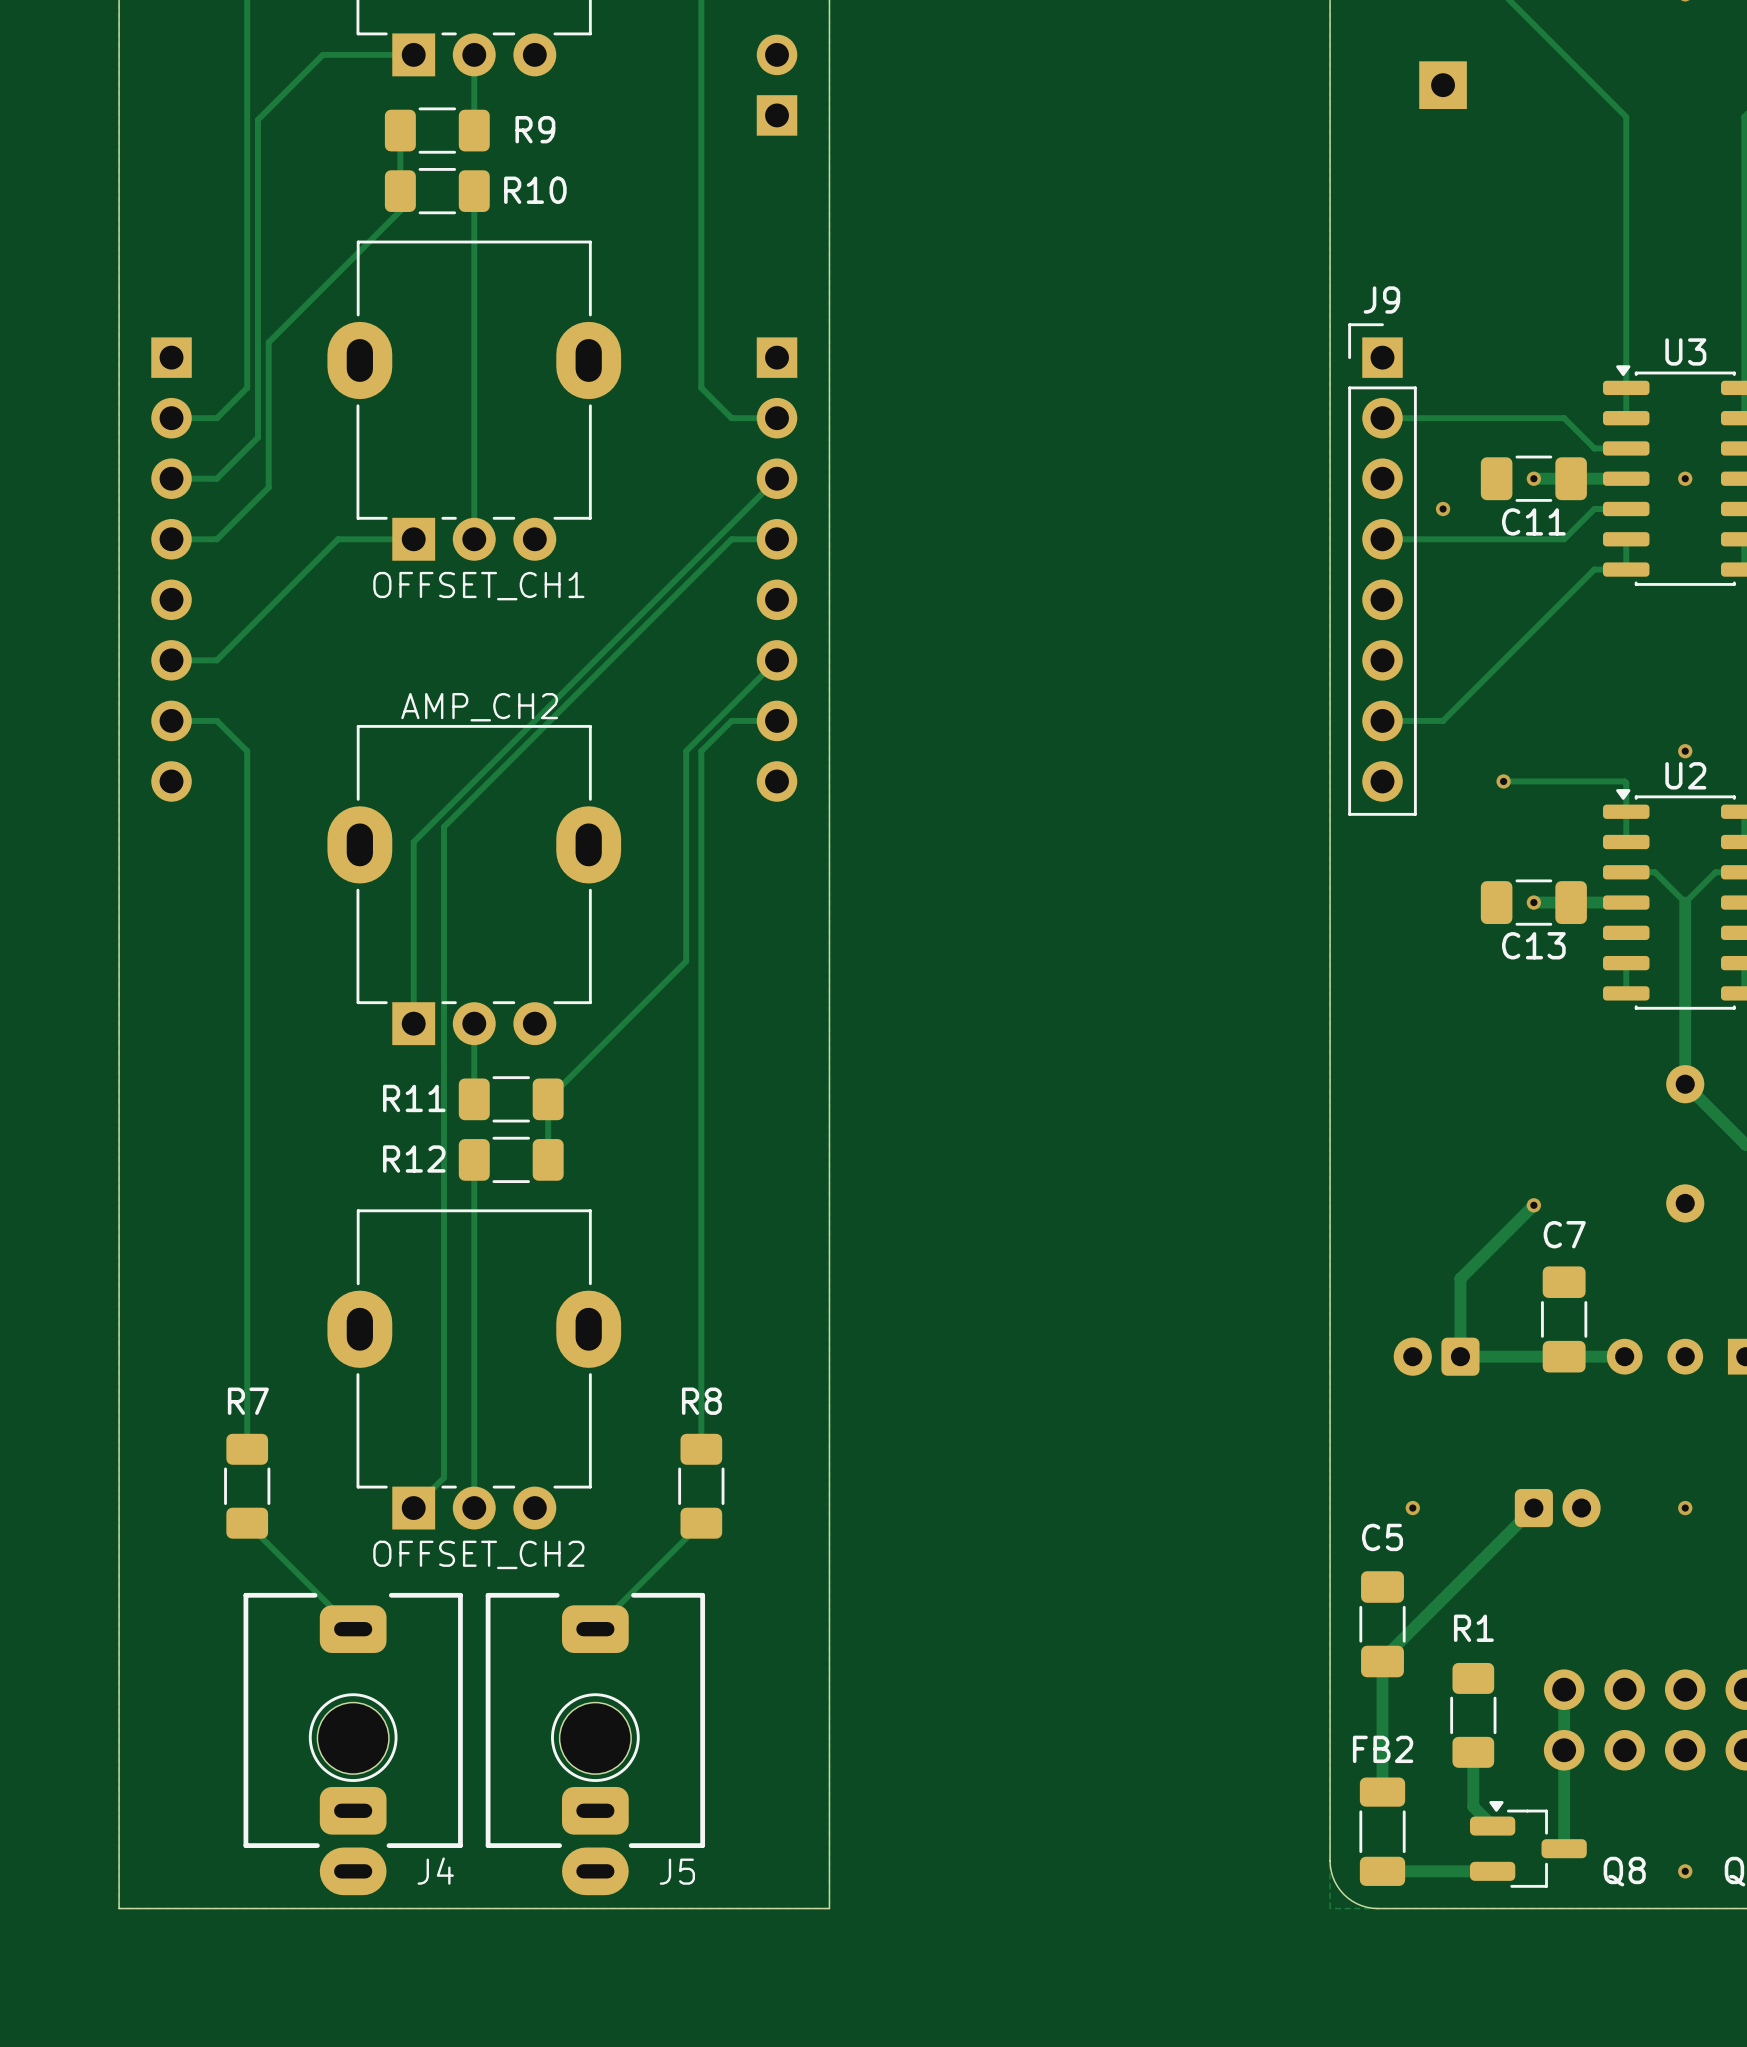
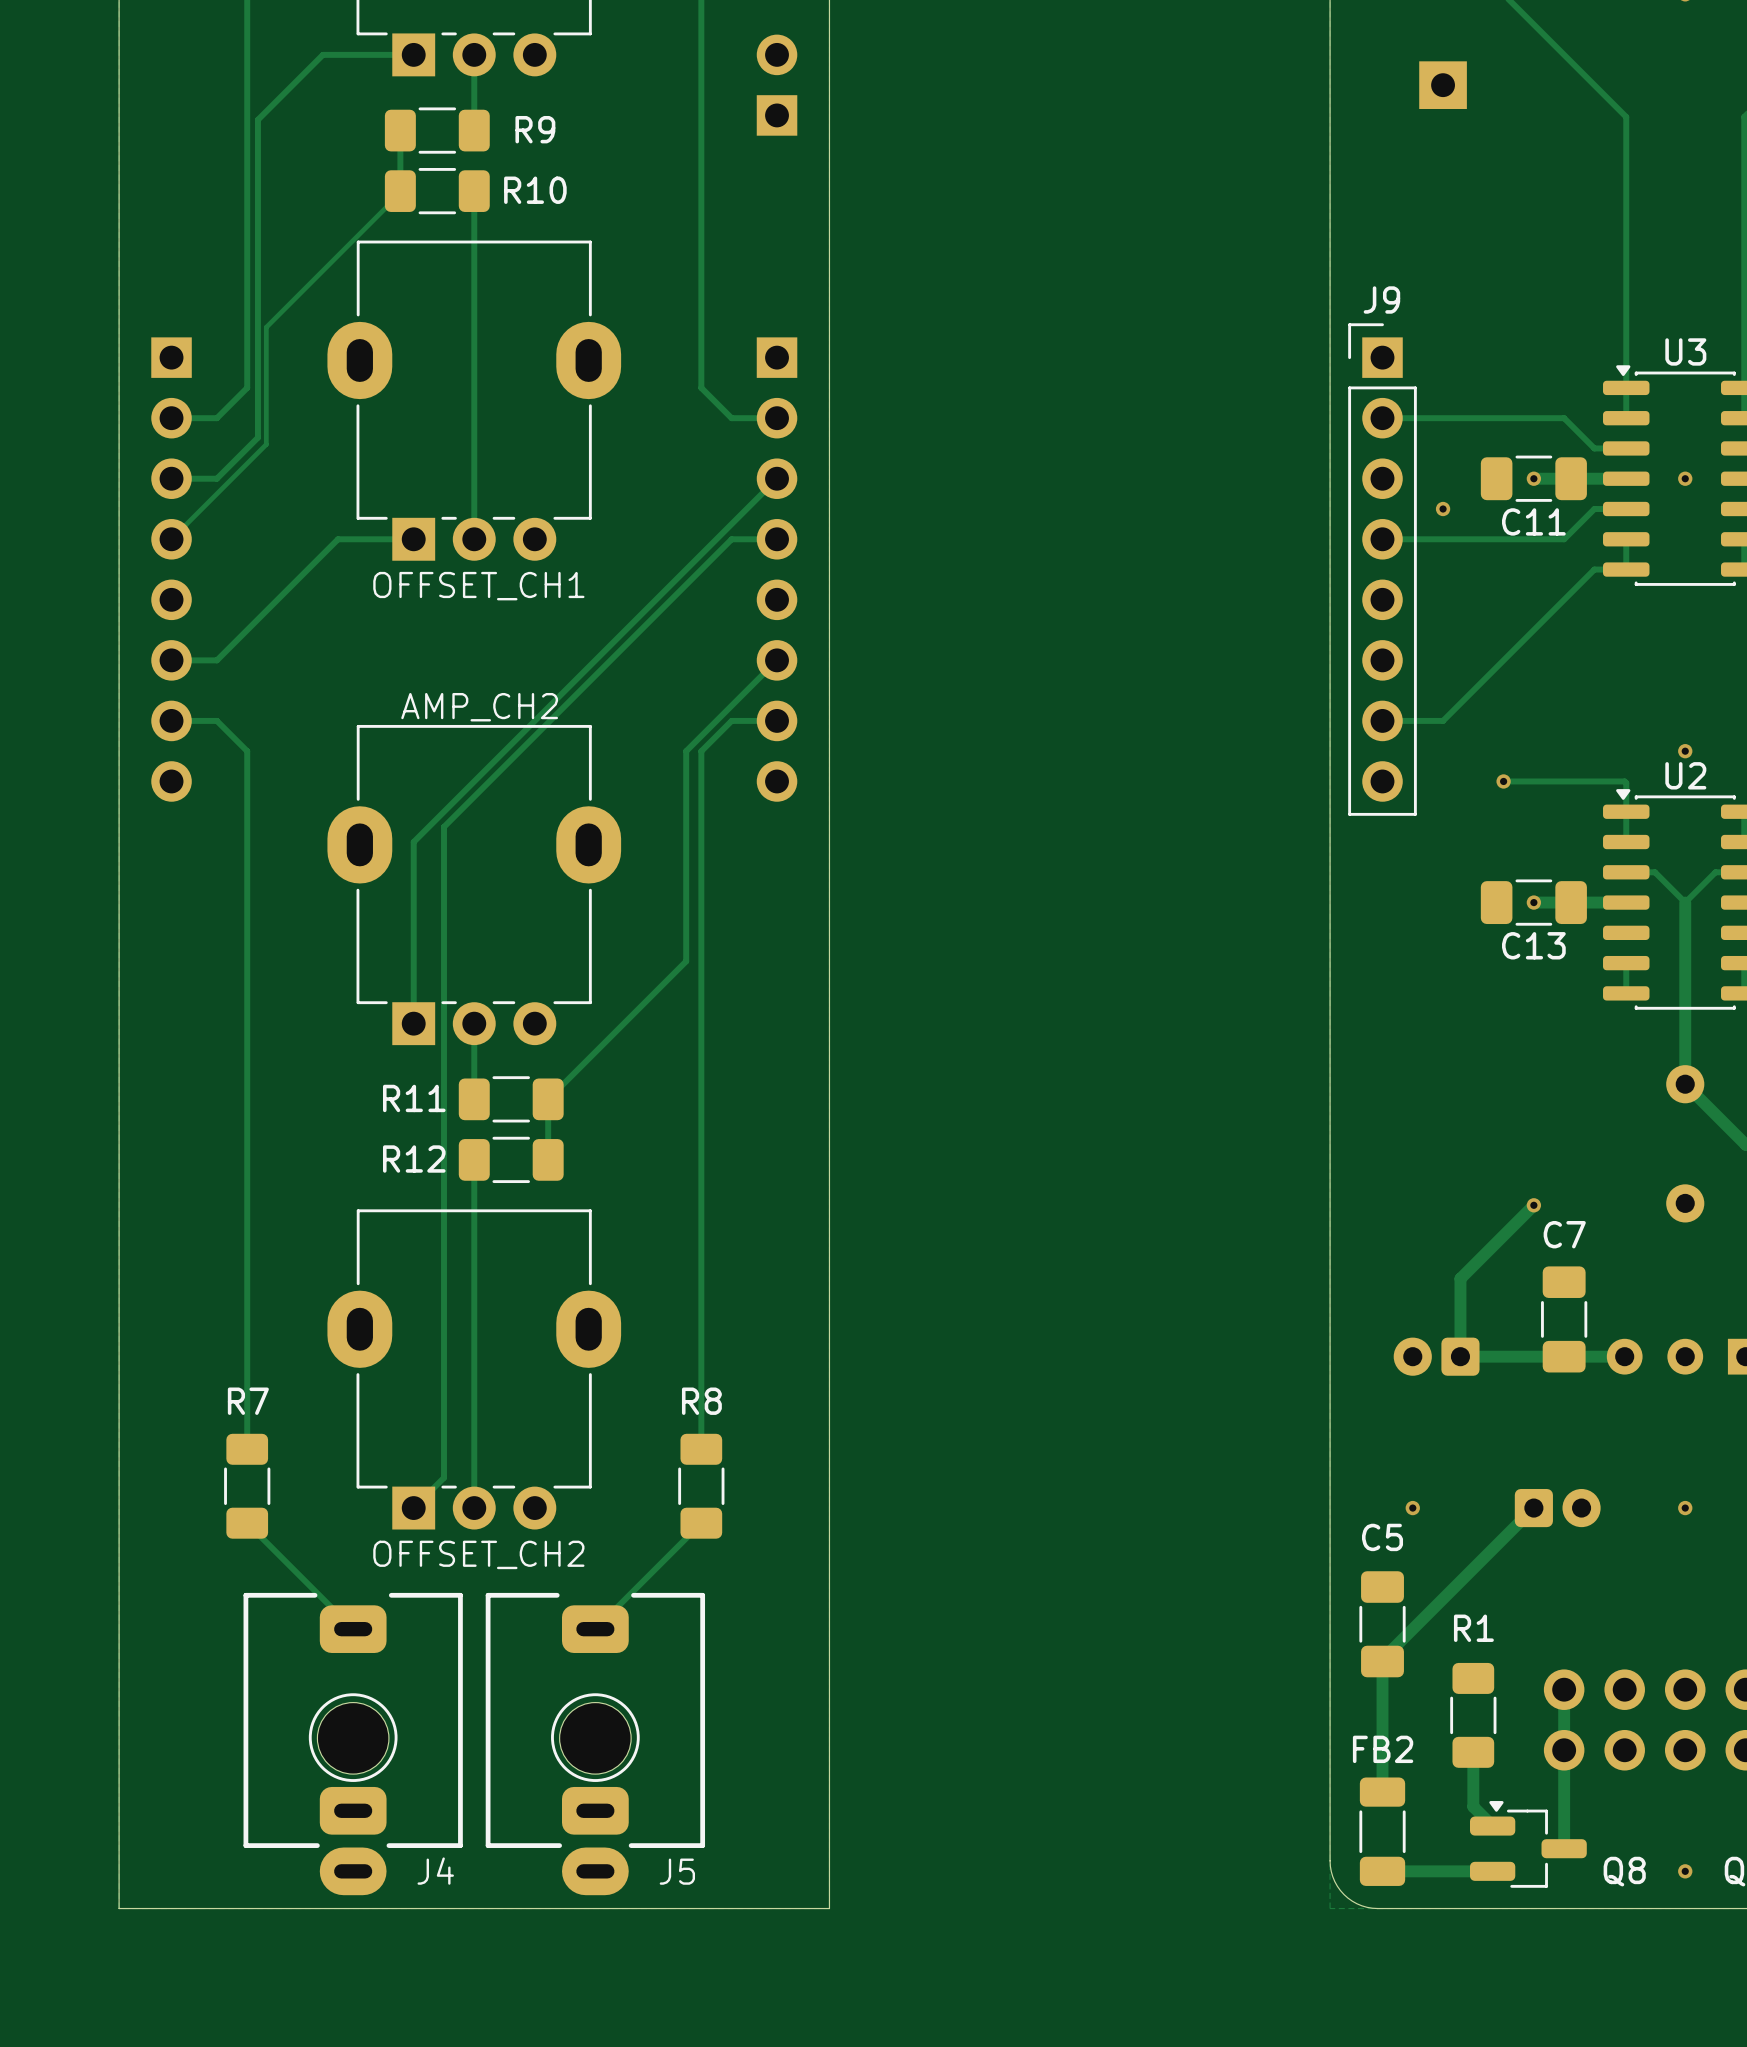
track: (400, 193) (400, 210) (268, 342) (268, 487) (216, 539) (171, 539) -> (400, 193) (266, 327) (266, 444) (171, 539)

